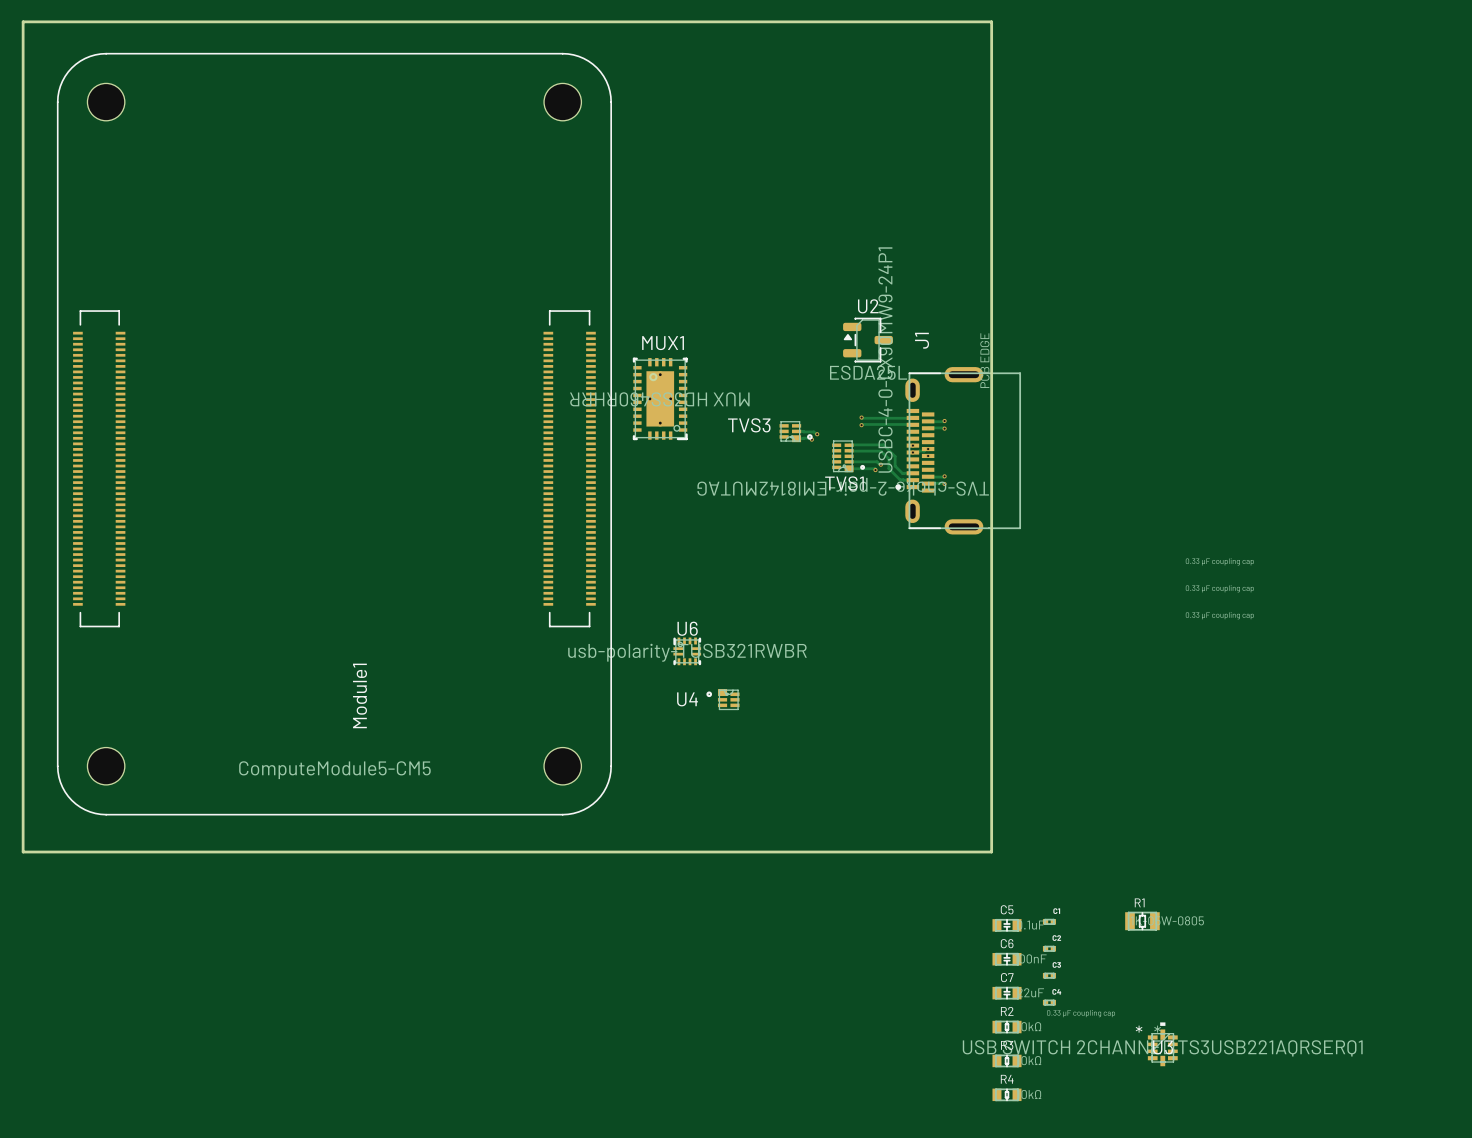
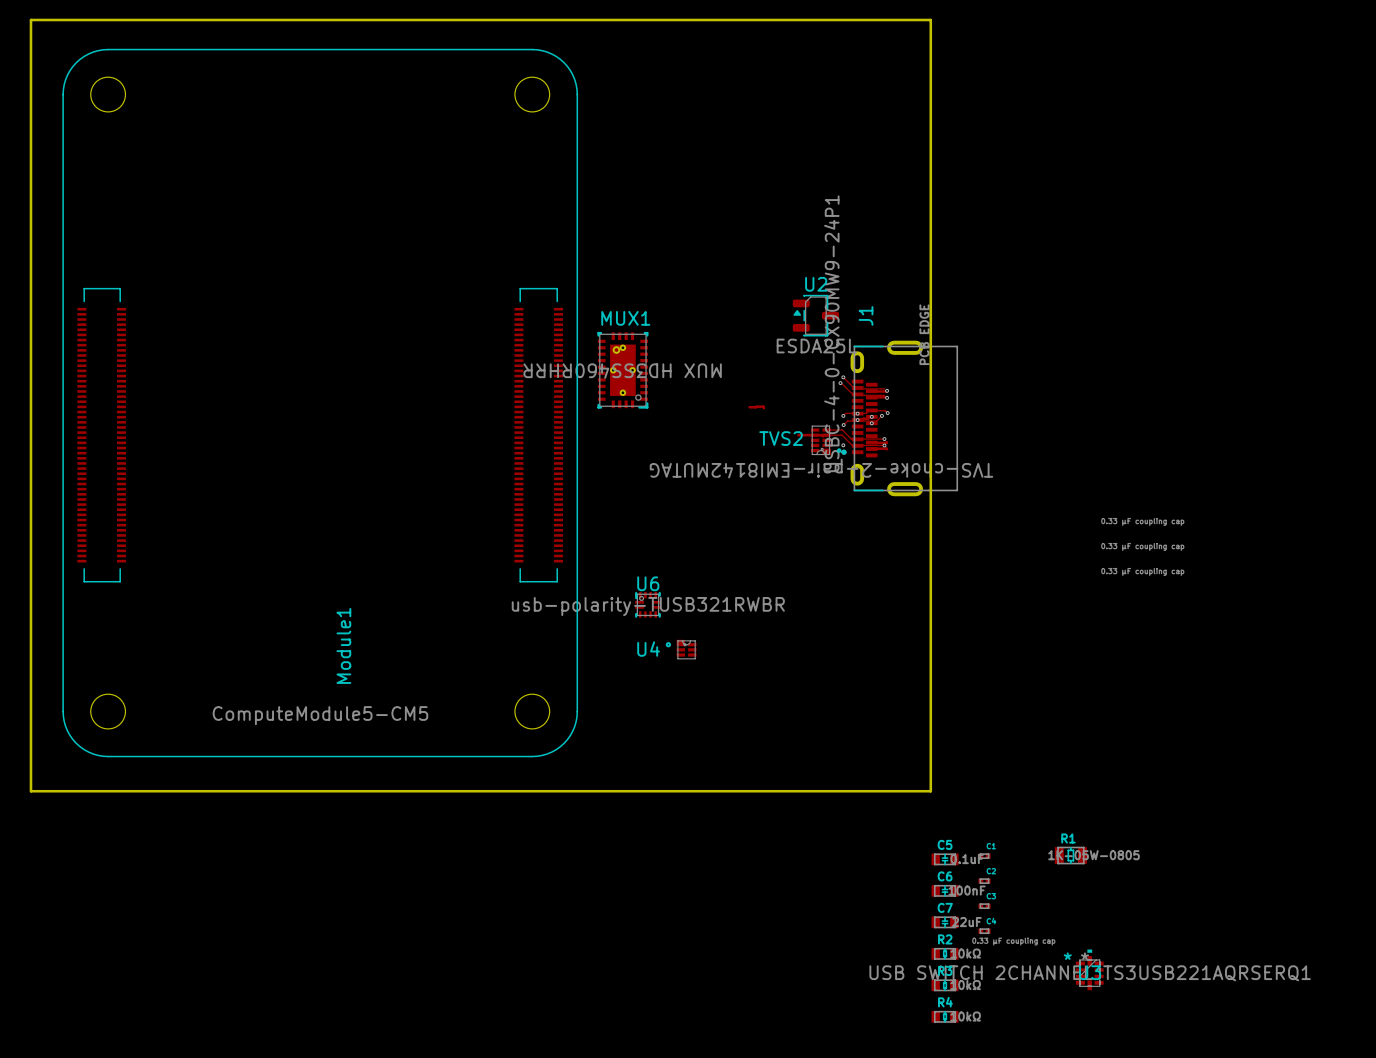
track: none -> (843, 377) (854, 388) (884, 388)
via: none -> (843, 377)
track: none -> (840, 383) (853, 395) (884, 395)
via: none -> (840, 383)
track: (861, 417) (912, 417) -> none
via: (861, 417) -> none
track: (912, 424) (861, 425) -> none
via: (861, 425) -> none
track: (796, 431) (813, 431) (817, 434) -> none
TVS3: (796, 431) -> none
via: (817, 434) -> none
via: (811, 439) -> none
track: none -> (887, 413) (885, 410) (869, 410) (866, 413) (845, 413) (843, 415)
via: none -> (887, 413)
track: (849, 445) (883, 444) (895, 456) (895, 466) (902, 473) (912, 473) -> none
via: none -> (843, 415)
track: none -> (881, 415) (876, 421) (847, 421) (843, 425)
via: none -> (881, 415)
track: (849, 450) (881, 451) (888, 459) (888, 468) (900, 479) (912, 480) -> none
TVS1: TVS-choke-2-pair-EMI8142MUTAG (848, 456) -> none
via: none -> (843, 425)
track: (849, 461) (877, 461) (880, 464) -> none
track: none -> (826, 430) (842, 430) (851, 439) (884, 439)
via: (880, 464) -> none
track: none -> (826, 435) (842, 435) (852, 445) (884, 445)
via: (875, 470) -> none
via: none -> (884, 439)
TVS2: none -> TVS-choke-2-pair-EMI8142MUTAG (826, 440)
via: (944, 476) -> none
via: none -> (843, 445)
via: none -> (884, 445)
via: (944, 483) -> none

